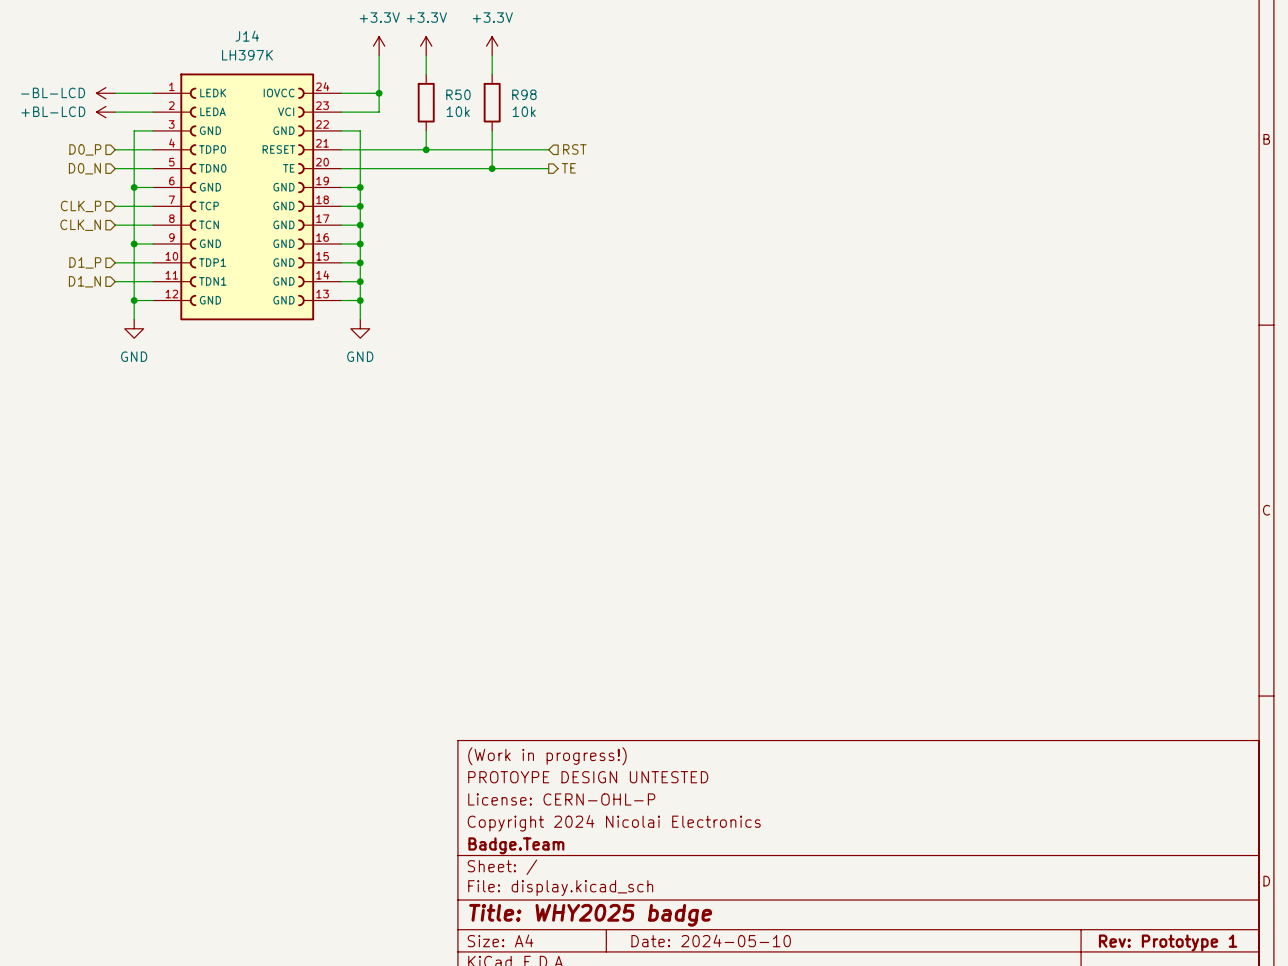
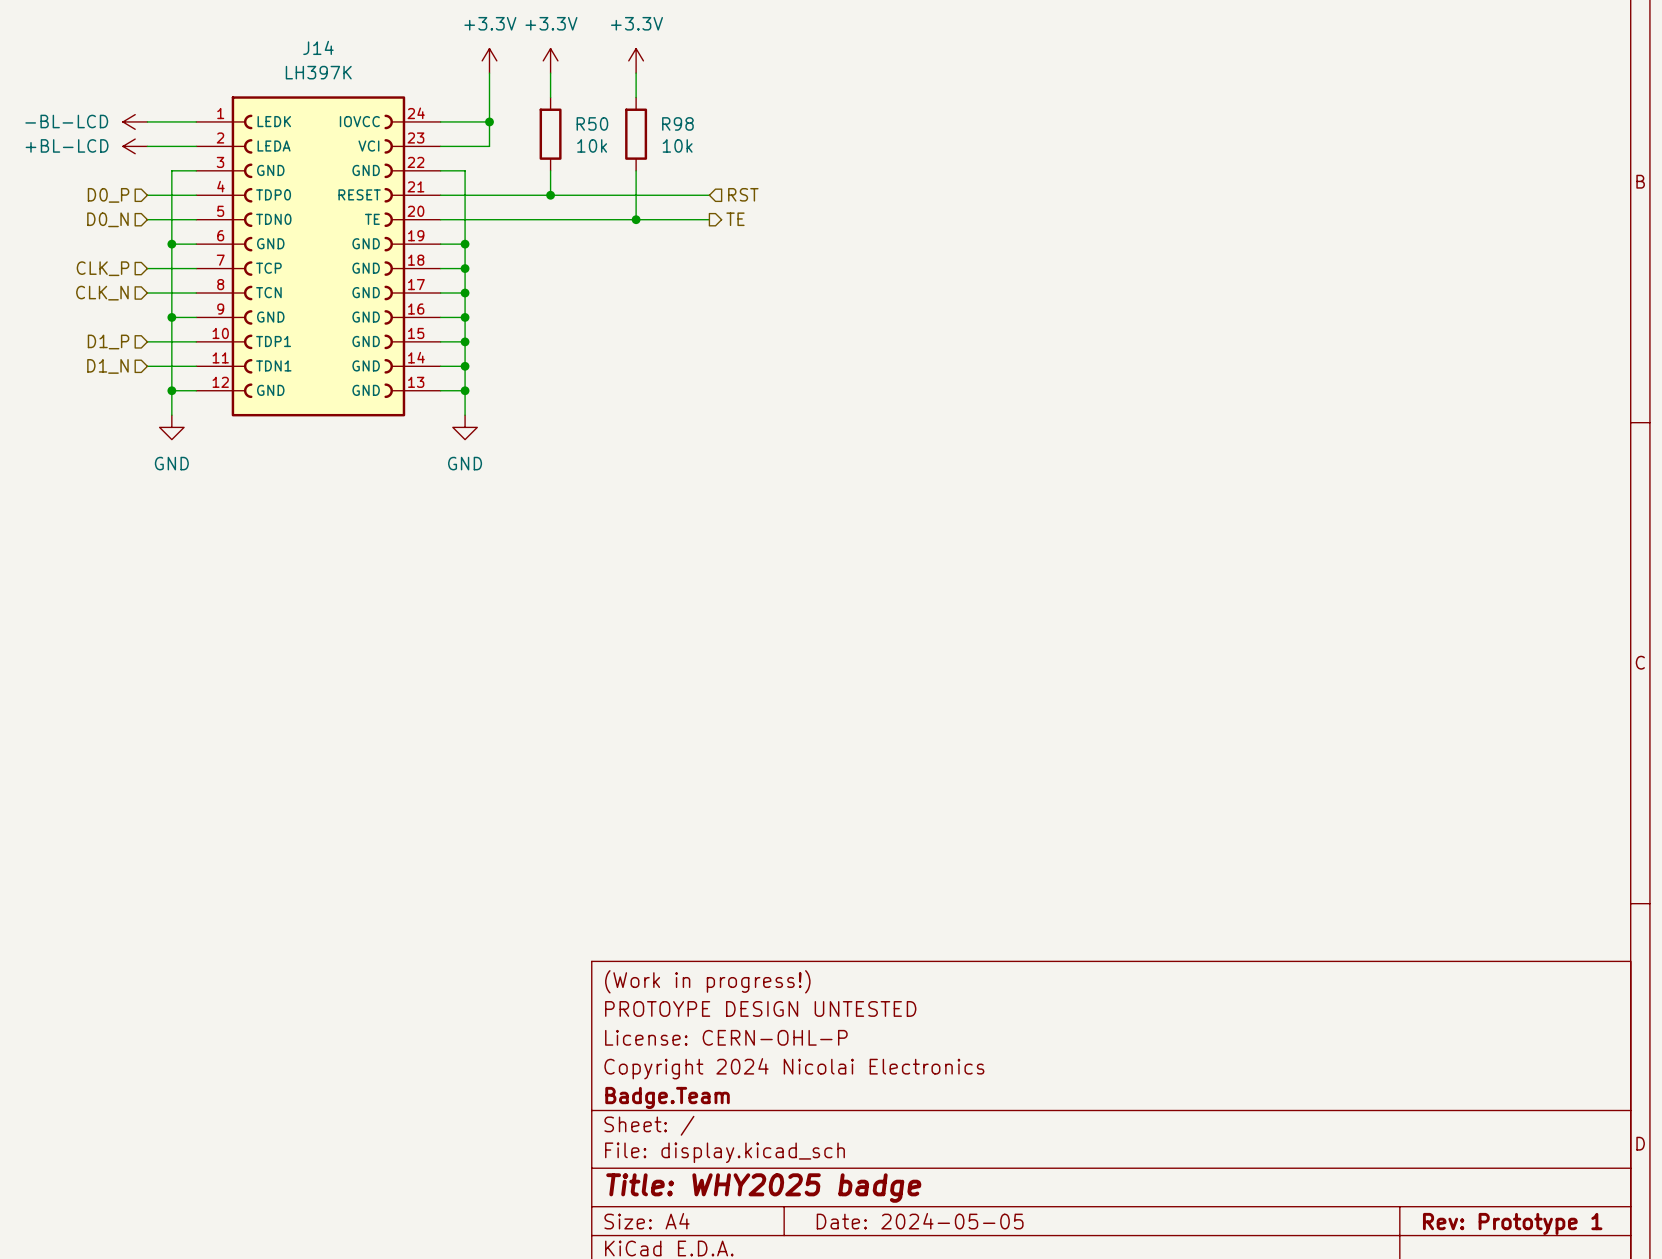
title block: Date: 2024-05-10 (711, 940) -> Date: 2024-05-05 (920, 1221)

